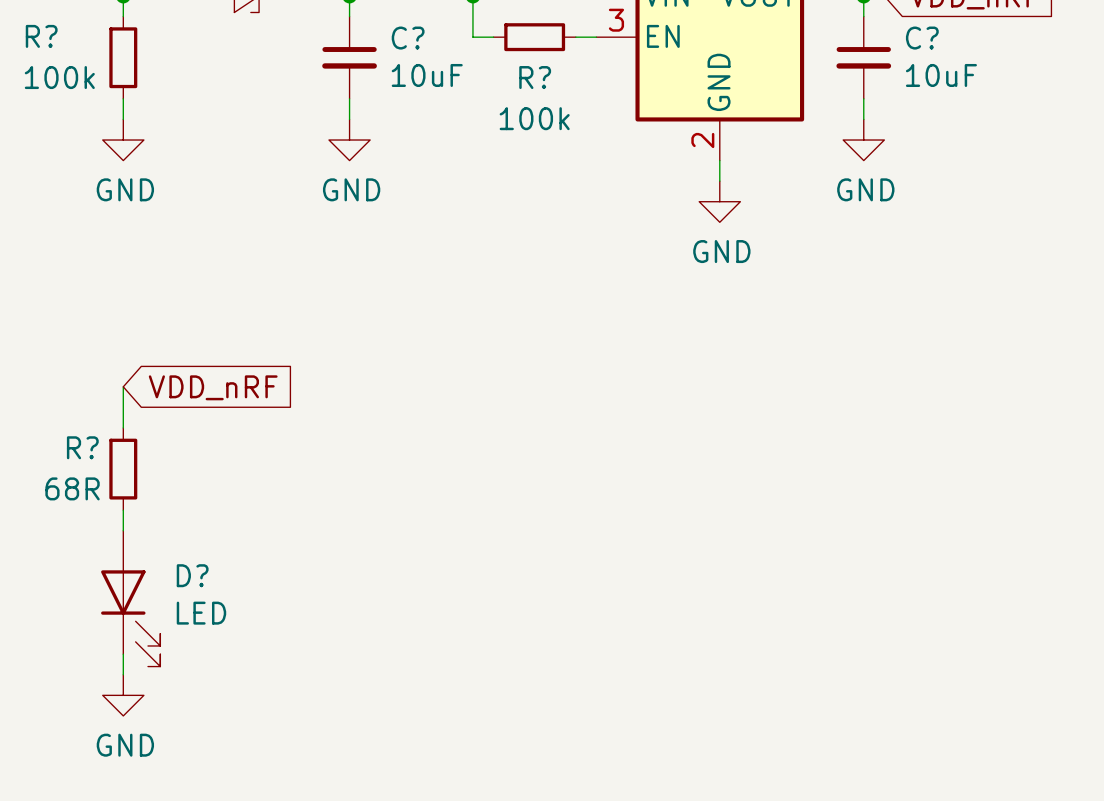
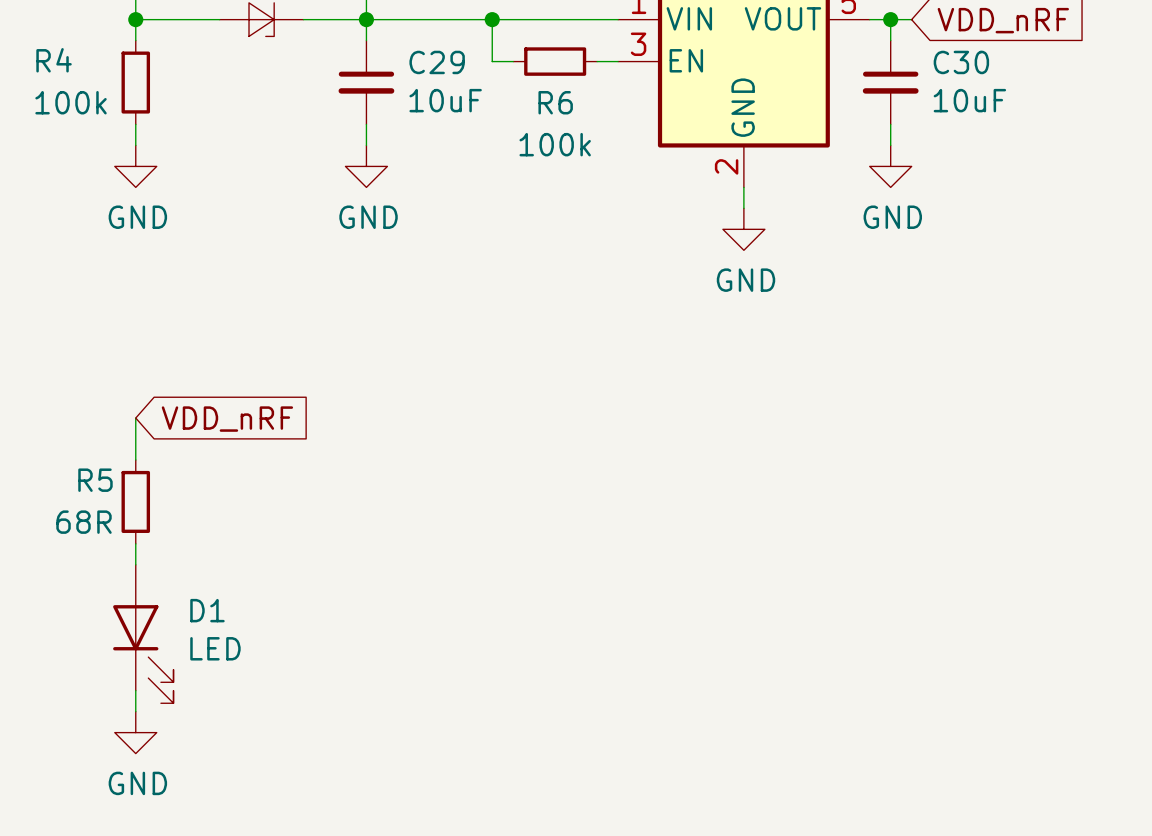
R? name: R? (41, 36) -> R4 (54, 60)
C? name: C? (408, 38) -> C29 (437, 62)
C? name: C? (922, 38) -> C30 (961, 62)
R? name: R? (535, 77) -> R6 (555, 102)
R? name: R? (82, 447) -> R5 (95, 480)
D? name: D? (192, 575) -> D1 (207, 610)

